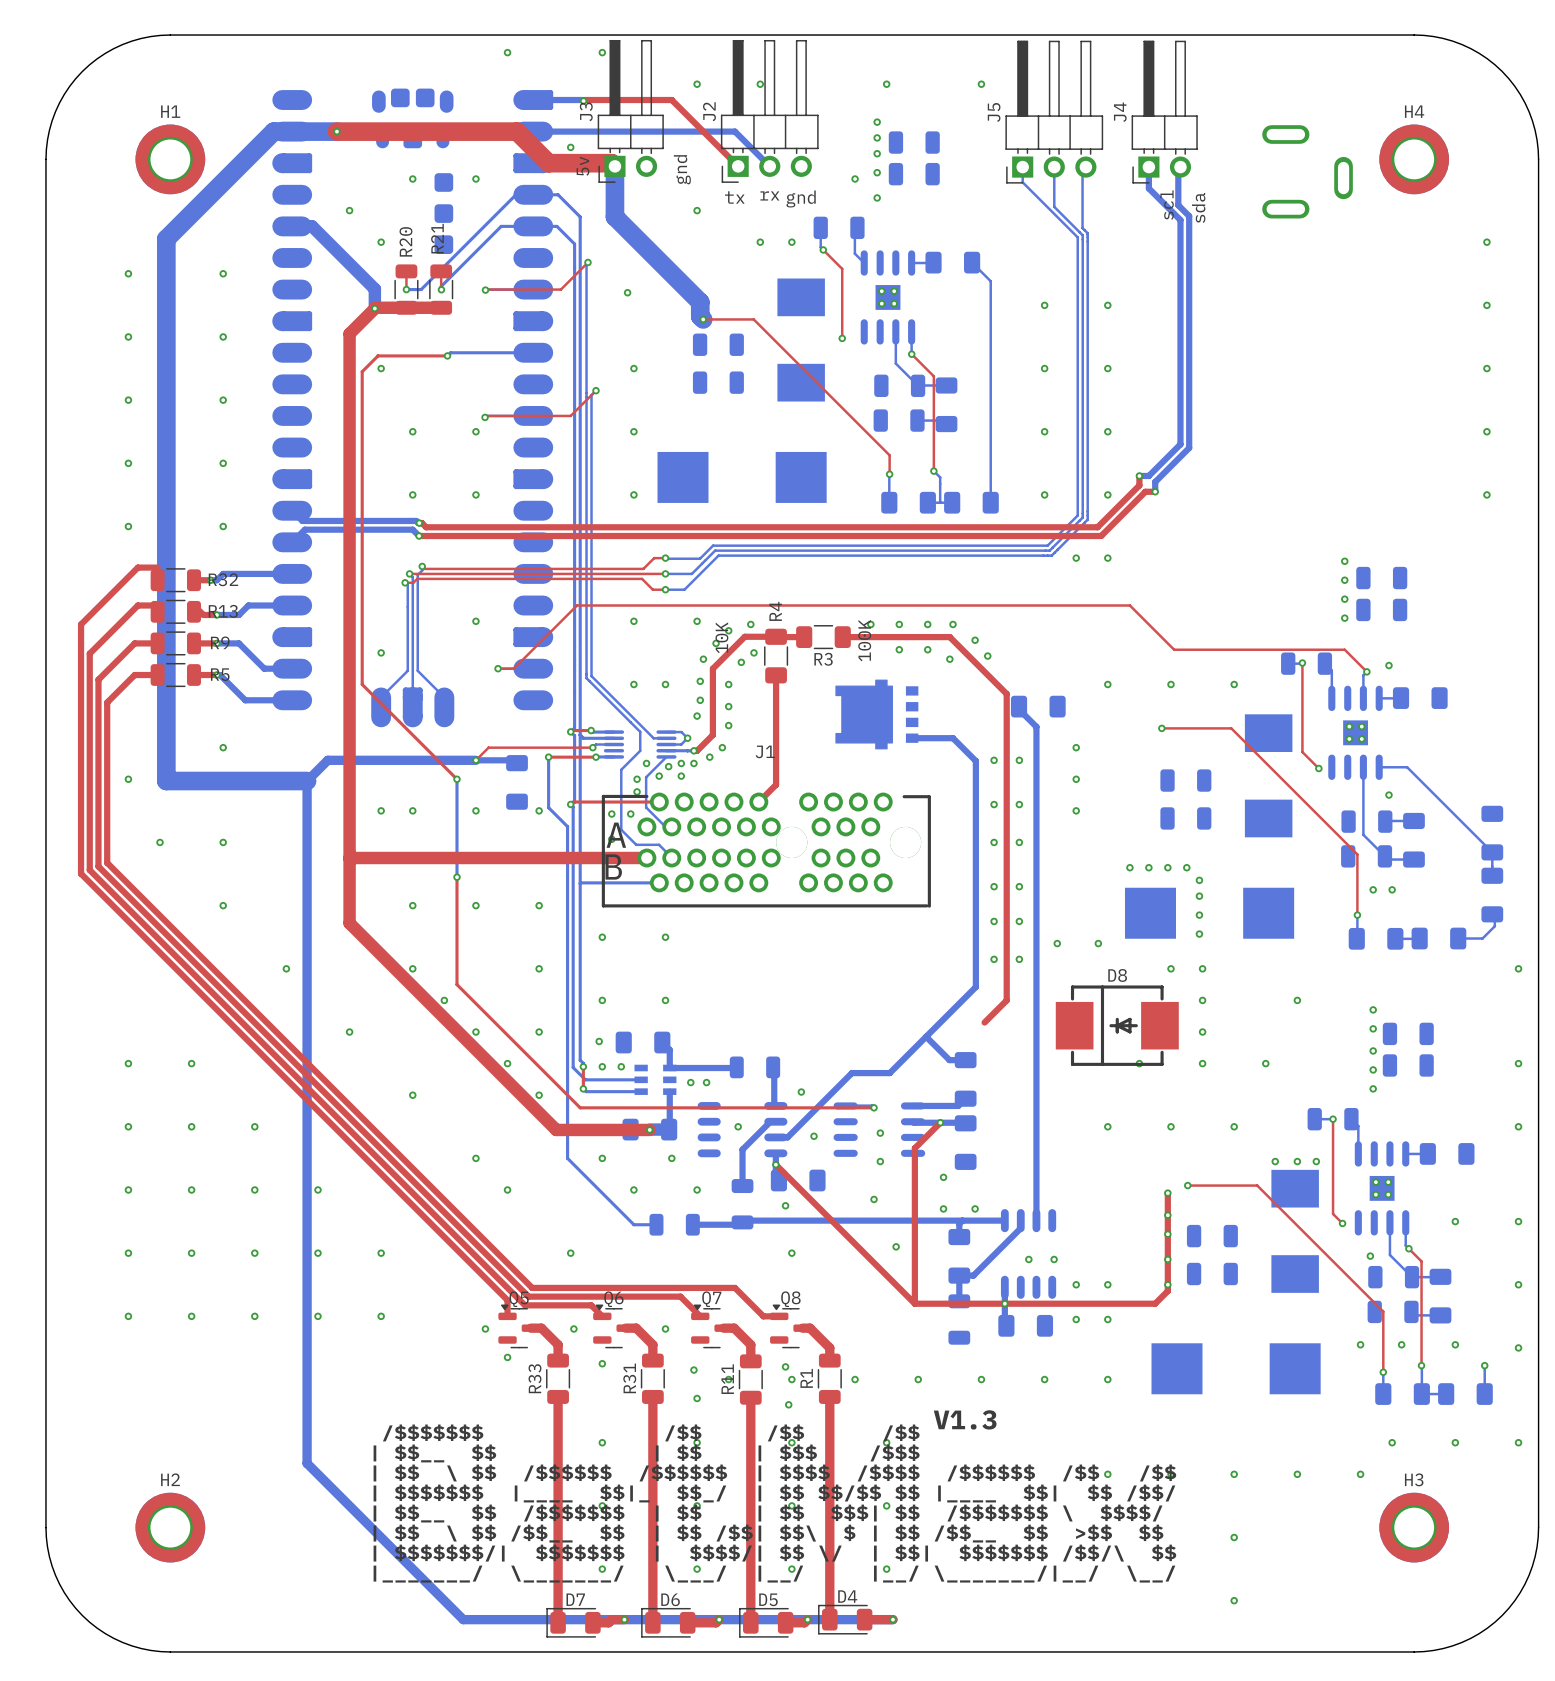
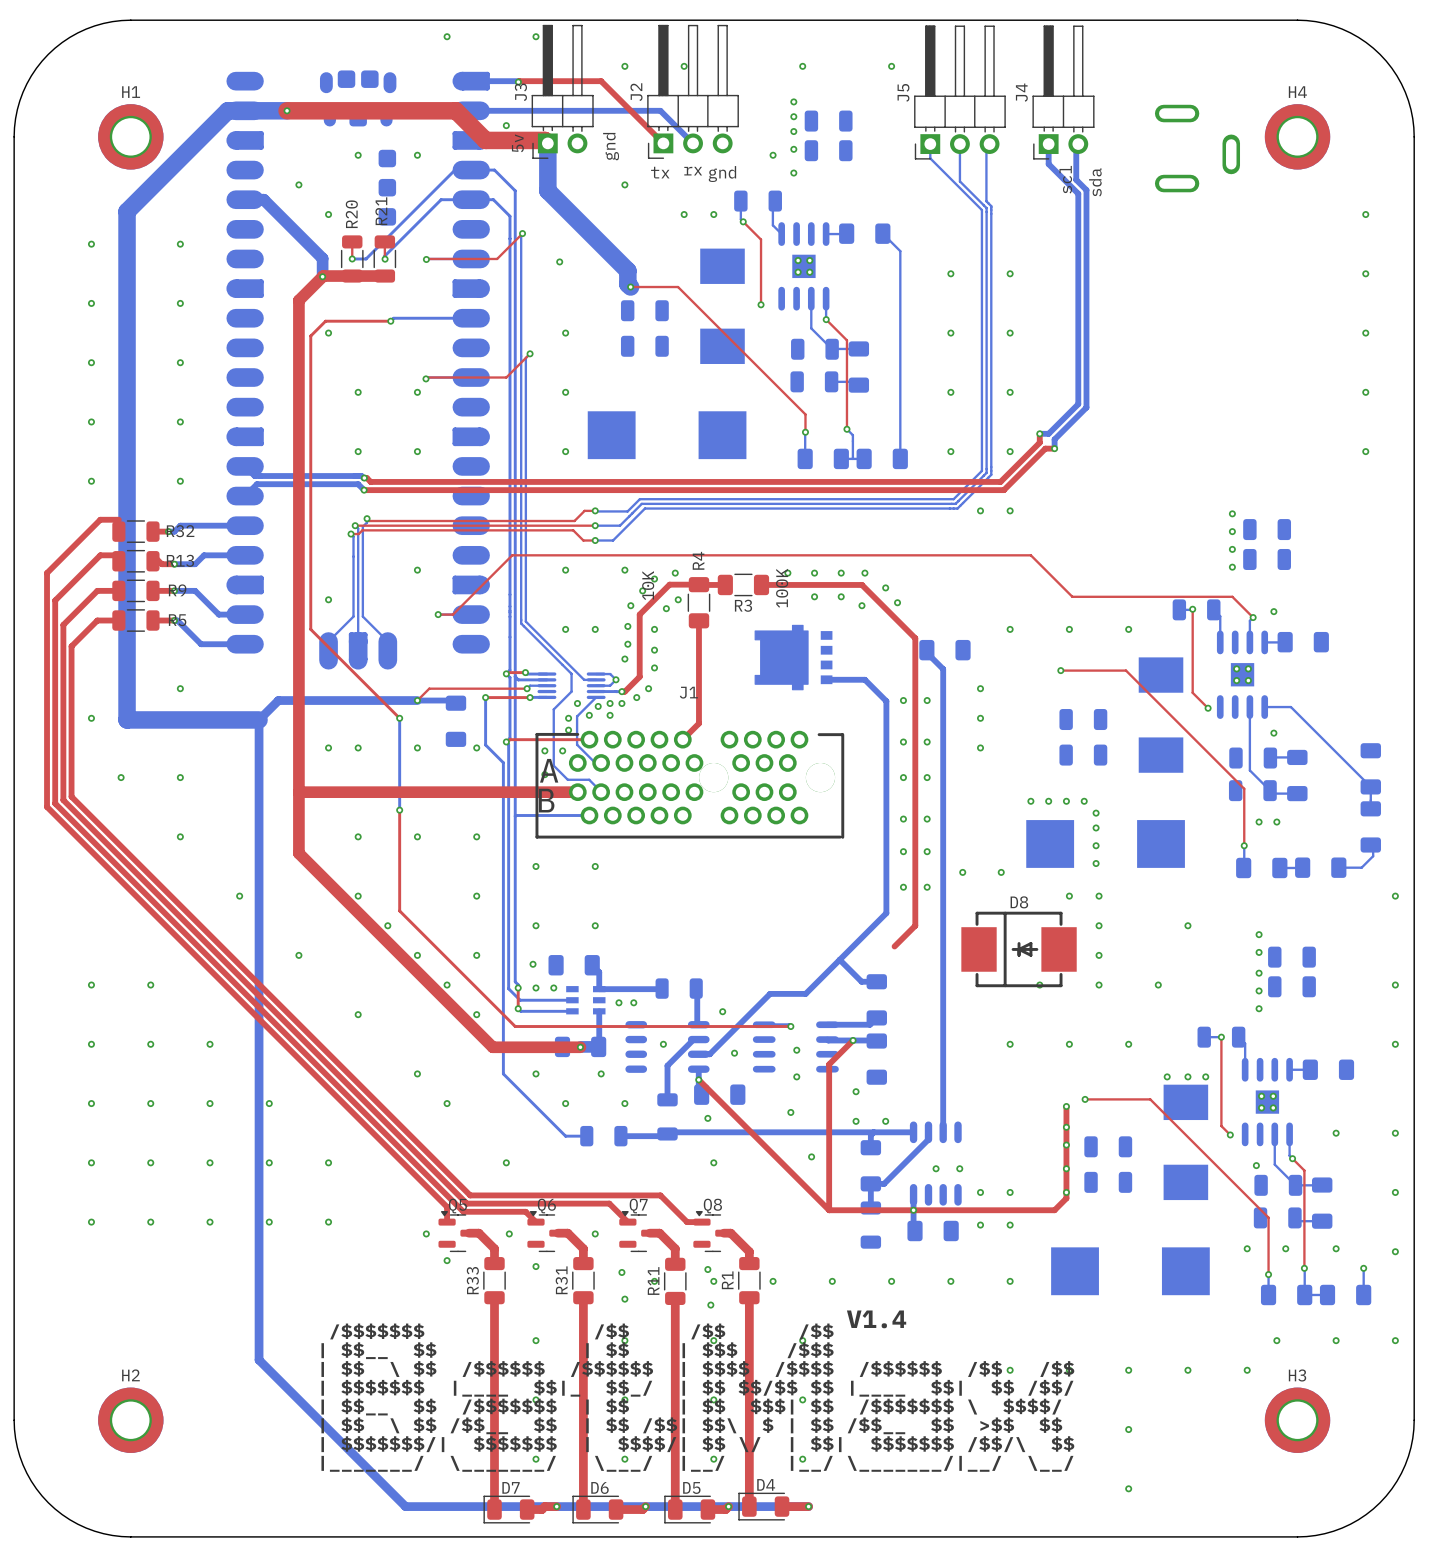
text: V1.3 (965, 1419) -> V1.4 (876, 1319)

